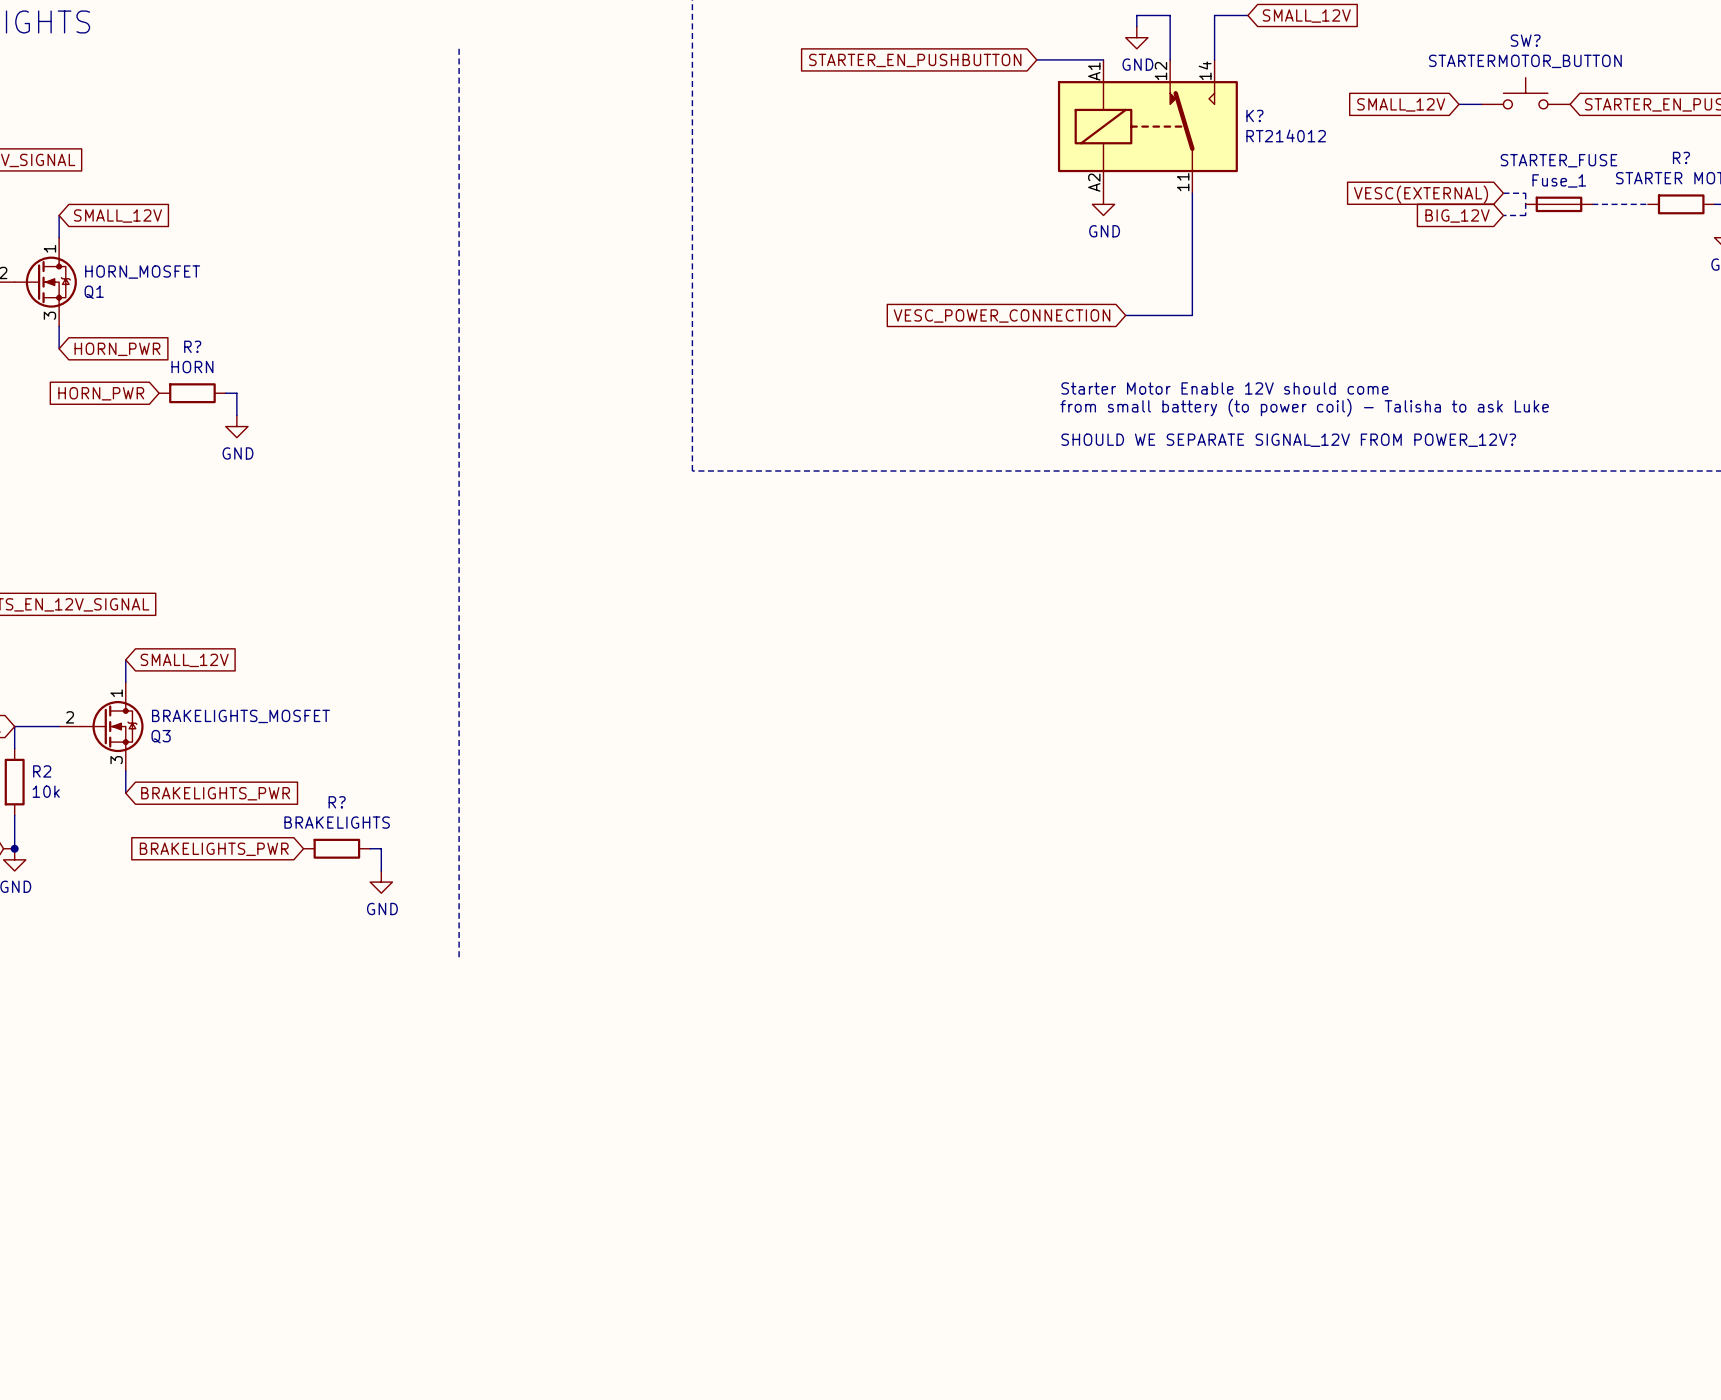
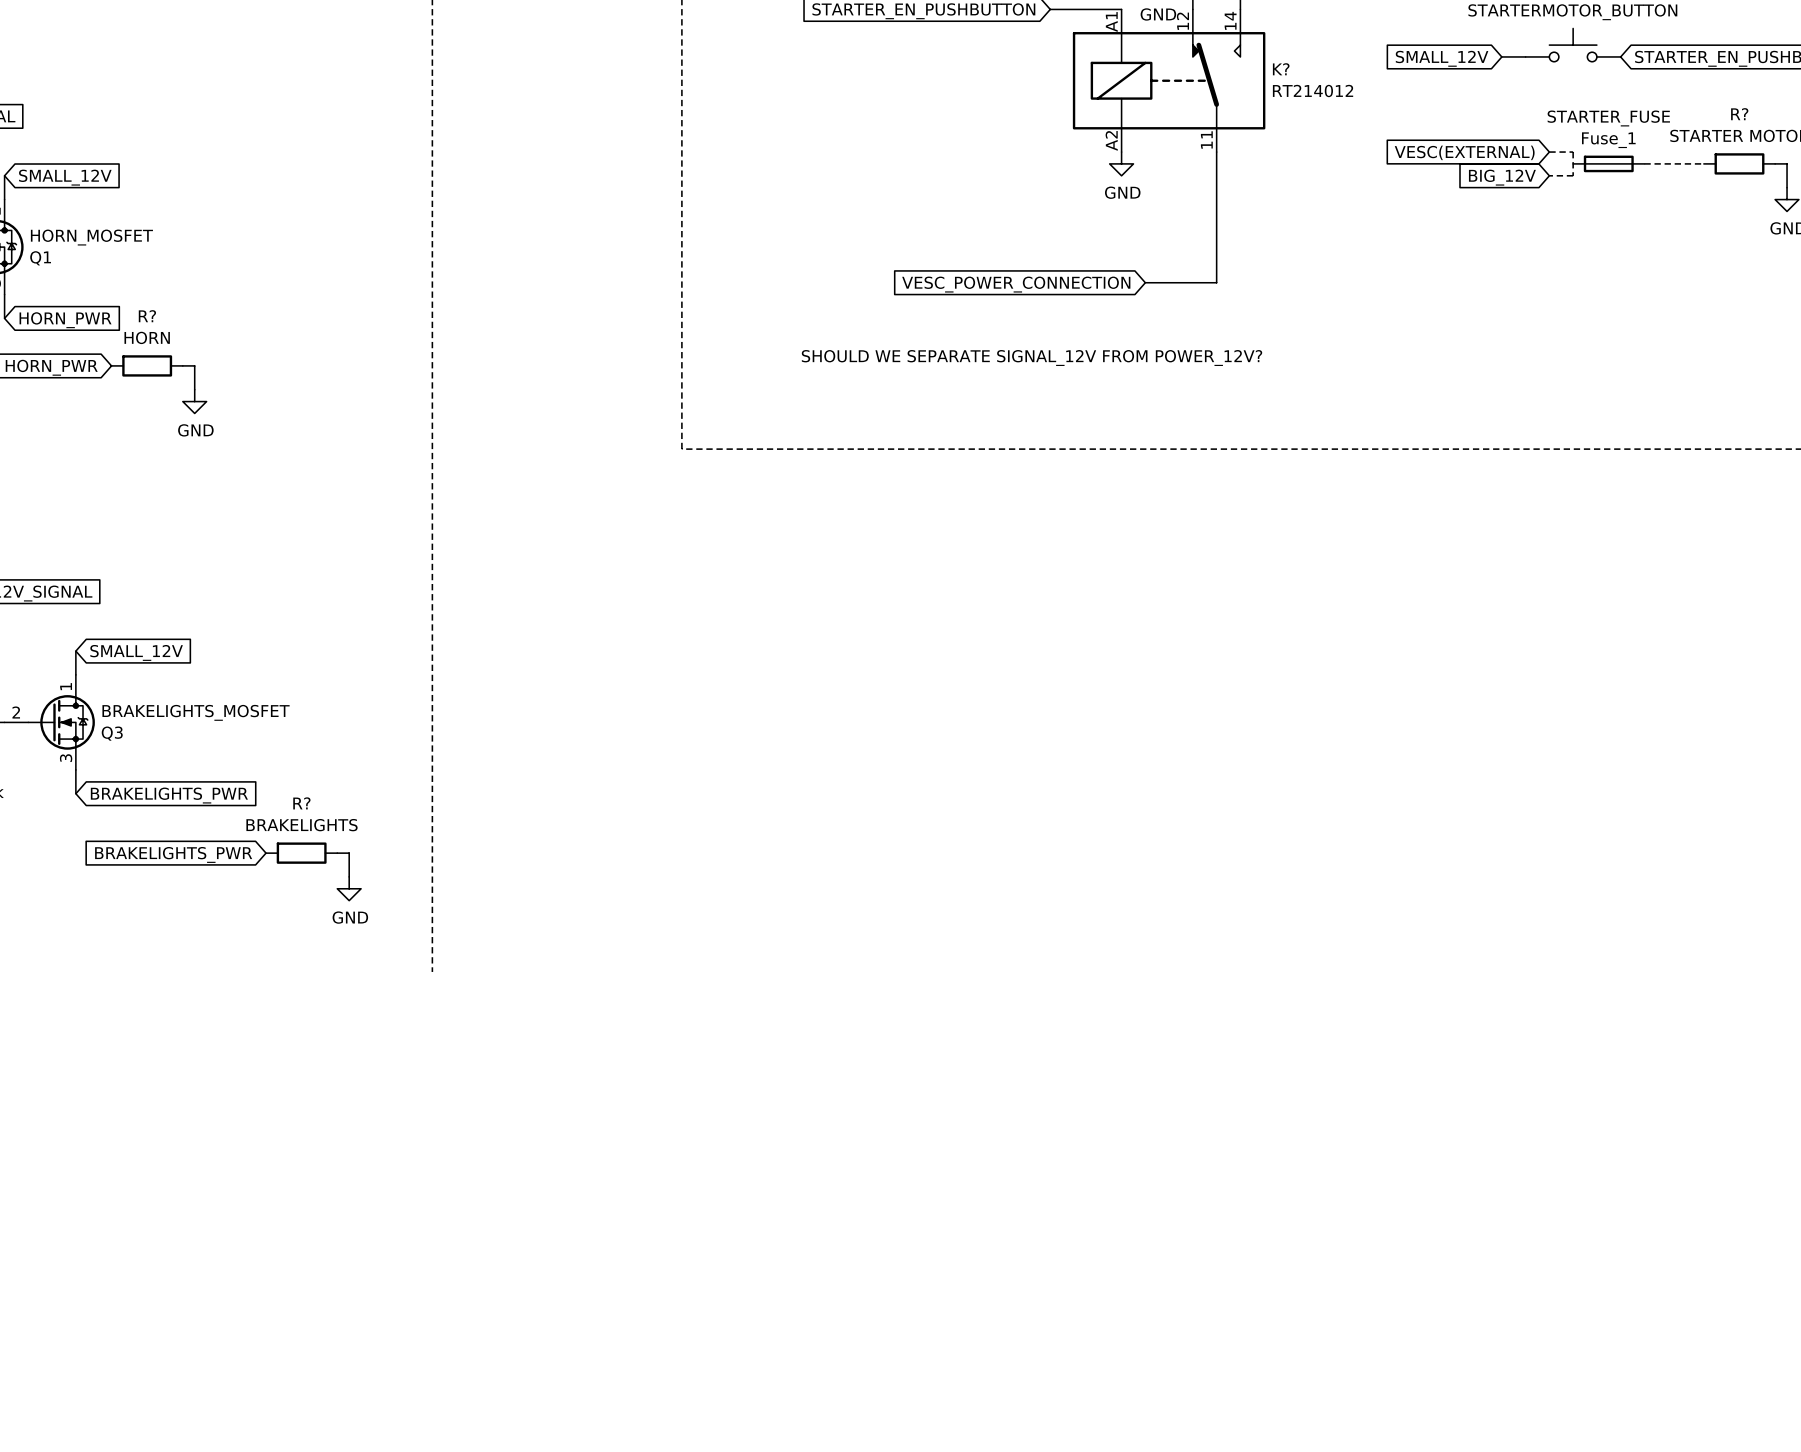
text: none -> SHOULD WE SEPARATE SIGNAL_12V FROM POWER_12V? (1032, 358)
text: Starter Motor Enable 12V should come (1224, 388) -> none
text: from small battery (to power coil) - Talisha to ask Luke (1304, 407) -> none
text: SHOULD WE SEPARATE SIGNAL_12V FROM POWER_12V? (1288, 440) -> none

